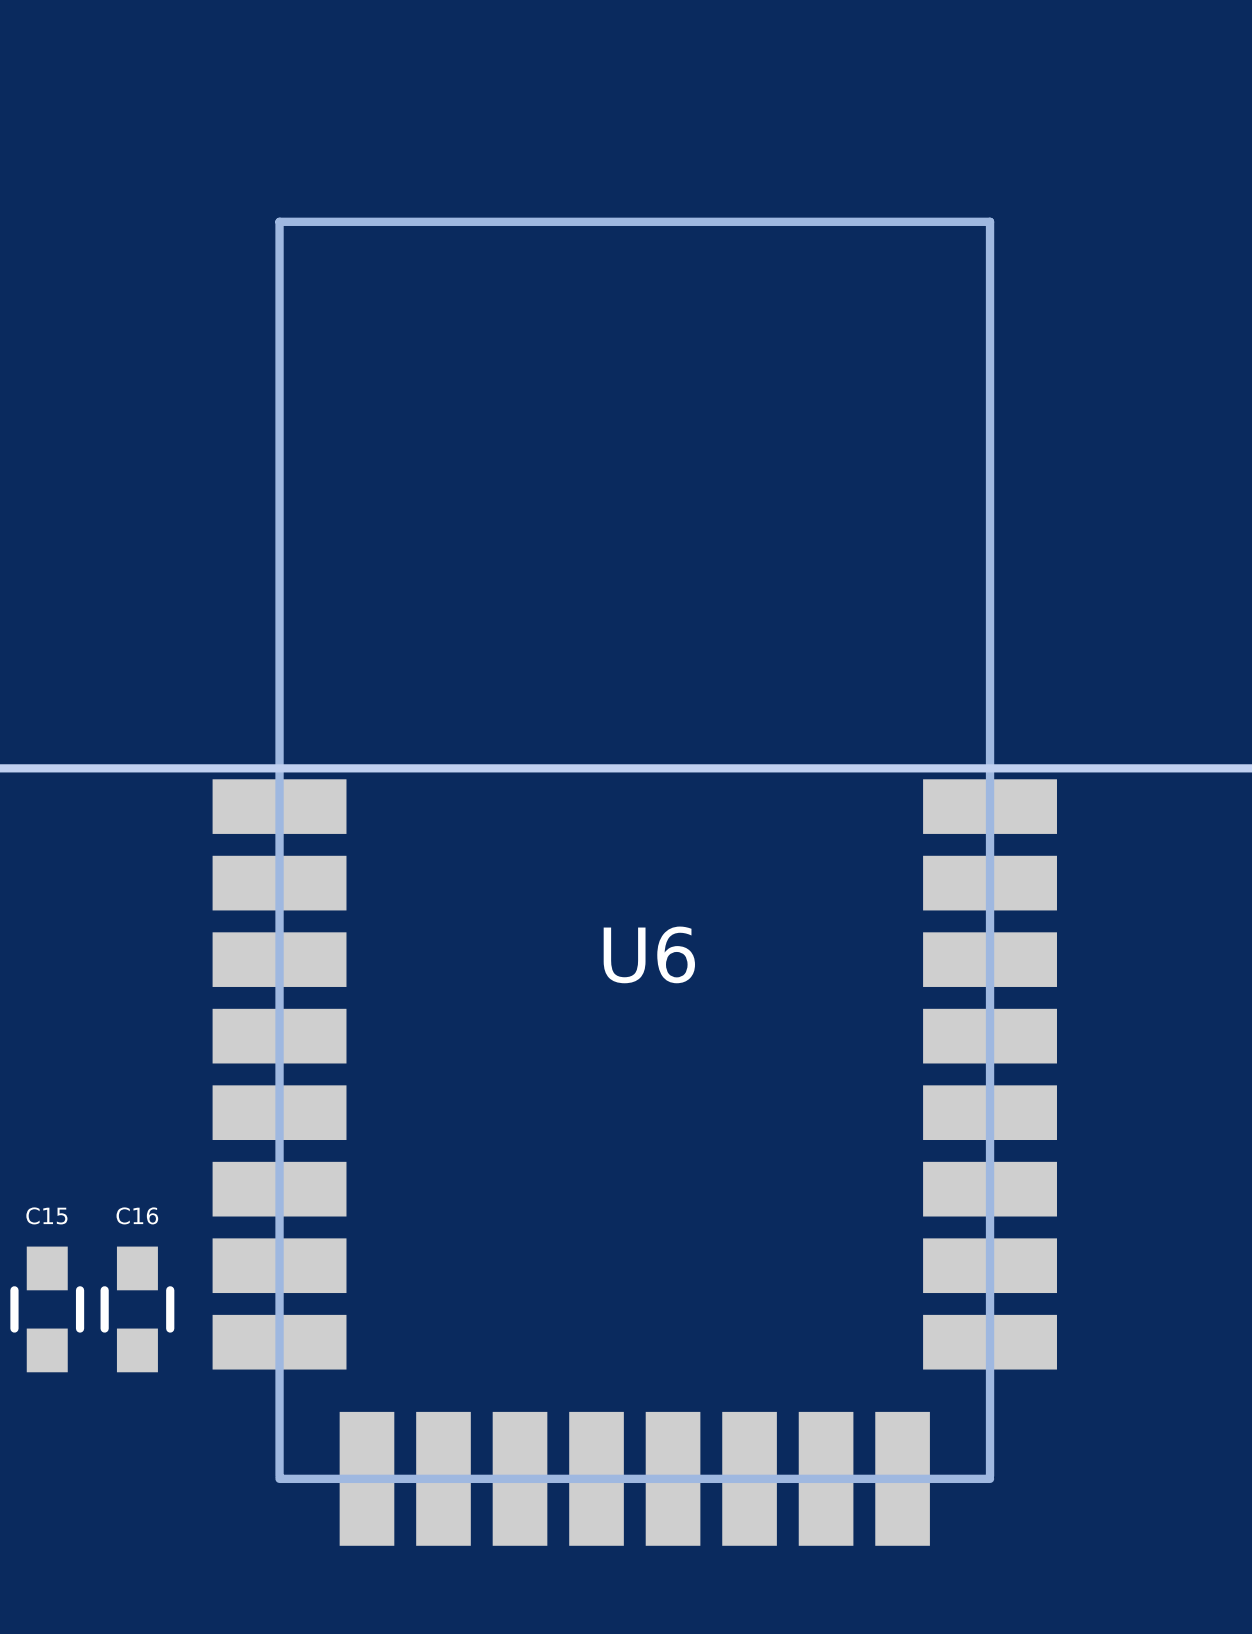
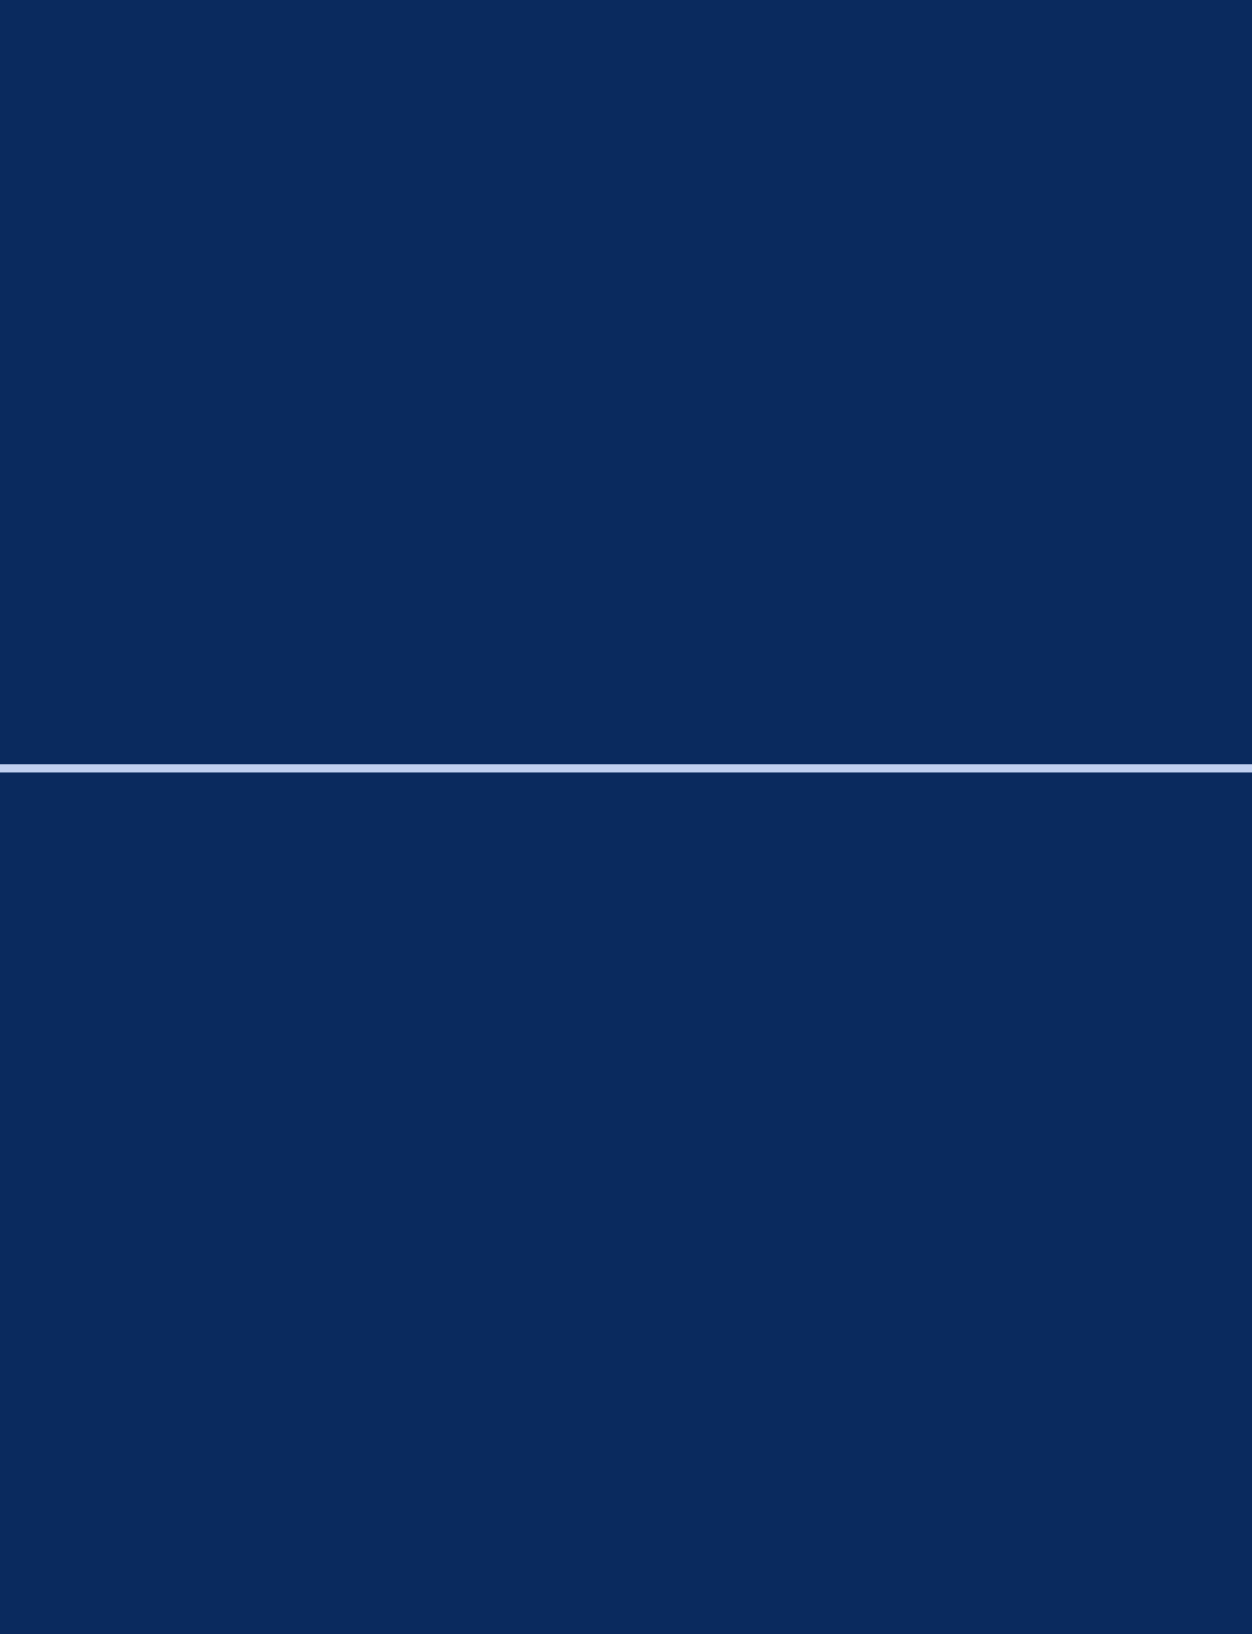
U6: (634, 881) -> none
C15: (47, 1309) -> none
C16: (137, 1309) -> none

